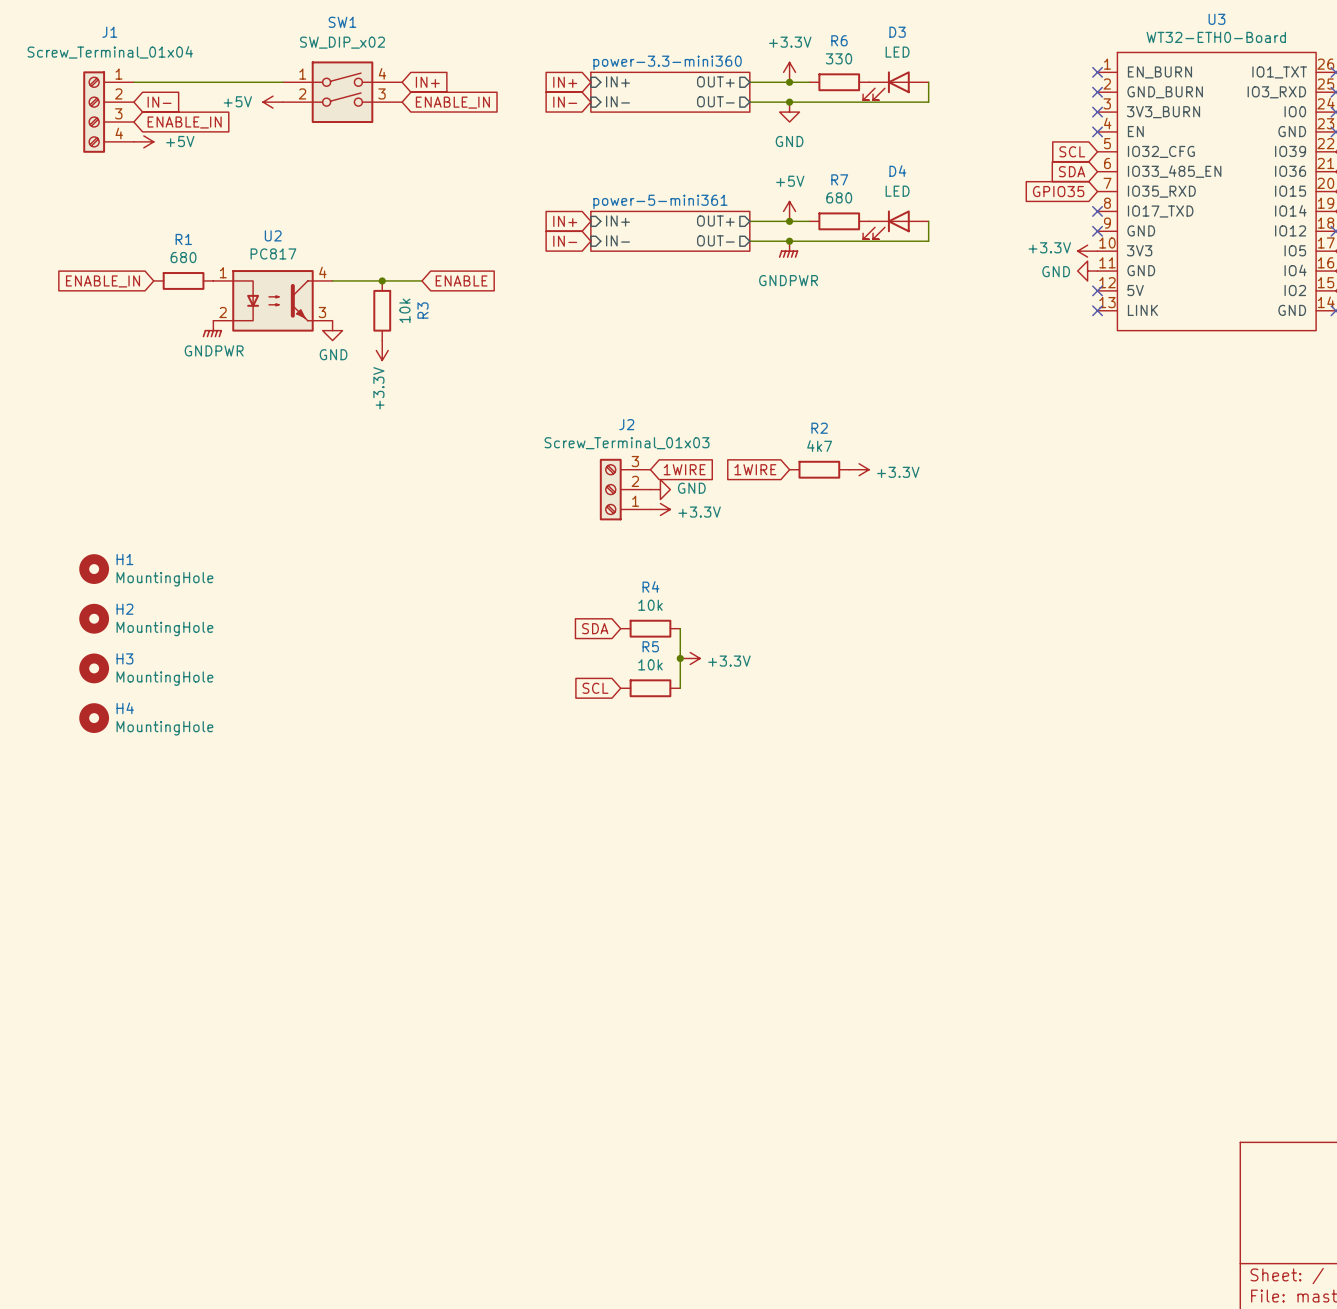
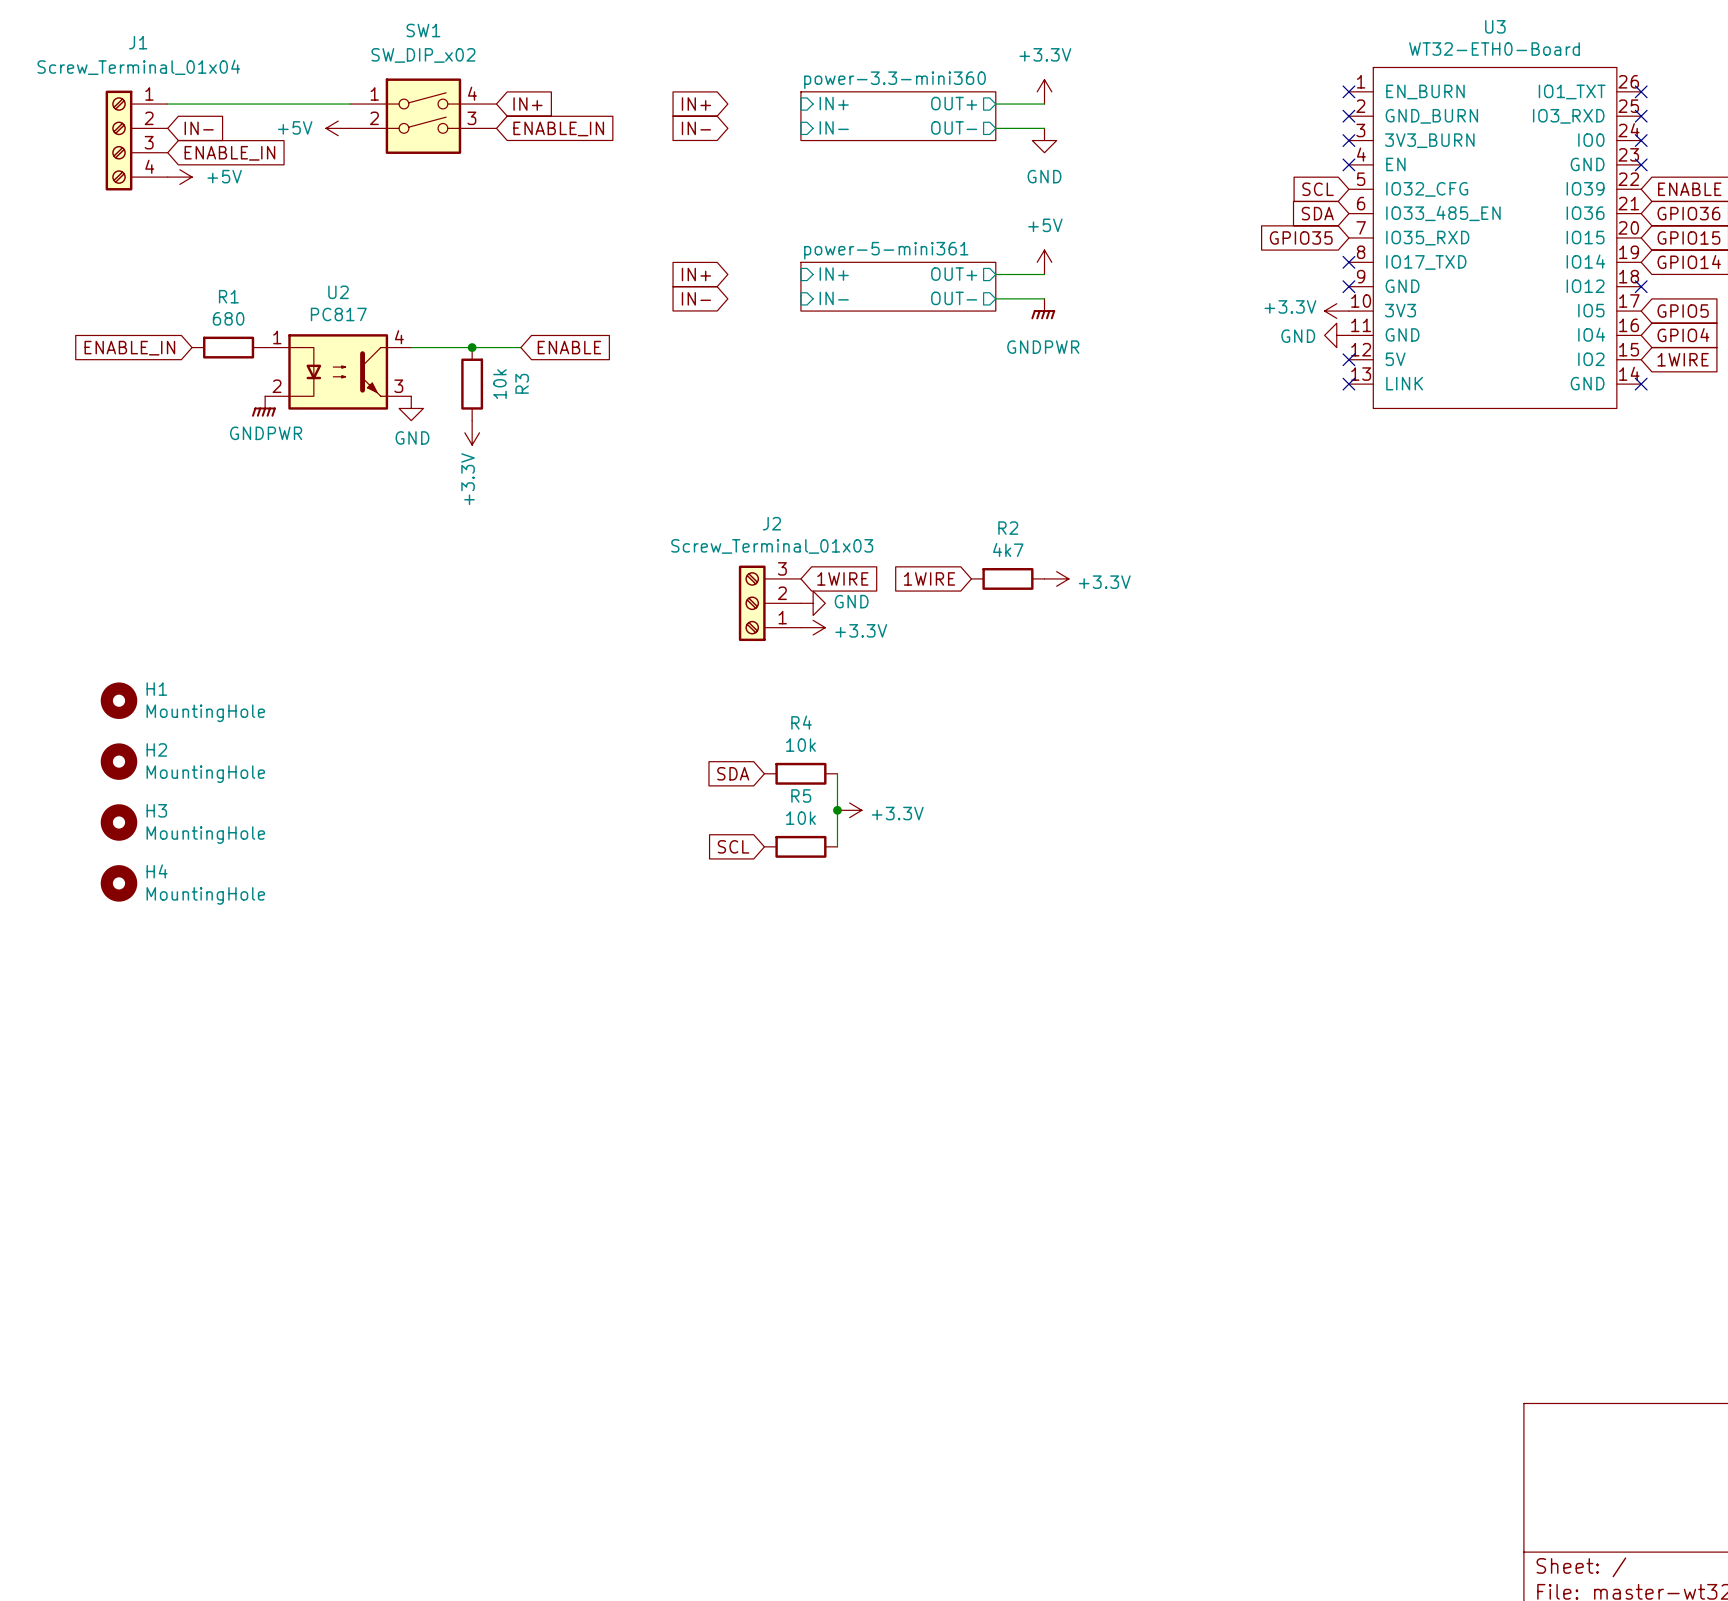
power symbol position: +3.3V (789, 72) -> +3.3V (1044, 91)
sheet pin position: IN+ (617, 81) -> IN+ (834, 103)
sheet pin position: OUT+ (715, 81) -> OUT+ (954, 103)
wire: (749, 82) (809, 82) -> (1044, 104) (995, 104)
junction: (789, 82) -> none
R6: 330 (839, 82) -> none
wire: (928, 82) (928, 102) (849, 102) -> none
D3: LED (895, 85) -> none
sheet power-3.3-mini360 position: (670, 92) -> (898, 116)
sheet pin position: IN- (617, 101) -> IN- (834, 127)
sheet pin position: OUT- (715, 101) -> OUT- (954, 127)
wire: (749, 102) (809, 102) -> none
junction: (789, 102) -> none
power symbol position: GND (789, 112) -> GND (1044, 140)
power symbol position: +5V (789, 211) -> +5V (1044, 262)
sheet pin position: IN+ (617, 220) -> IN+ (834, 274)
sheet pin position: OUT+ (715, 220) -> OUT+ (954, 274)
wire: (749, 221) (809, 221) -> (1044, 274) (995, 274)
junction: (789, 221) -> none
R7: 680 (839, 221) -> none
wire: (928, 221) (928, 241) (849, 241) -> none
D4: LED (895, 224) -> none
sheet power-5-mini361 position: (670, 231) -> (898, 286)
sheet pin position: IN- (617, 240) -> IN- (834, 298)
sheet pin position: OUT- (715, 240) -> OUT- (954, 298)
wire: (749, 241) (809, 241) -> none
junction: (789, 241) -> none
power symbol position: GNDPWR (788, 249) -> GNDPWR (1043, 309)

